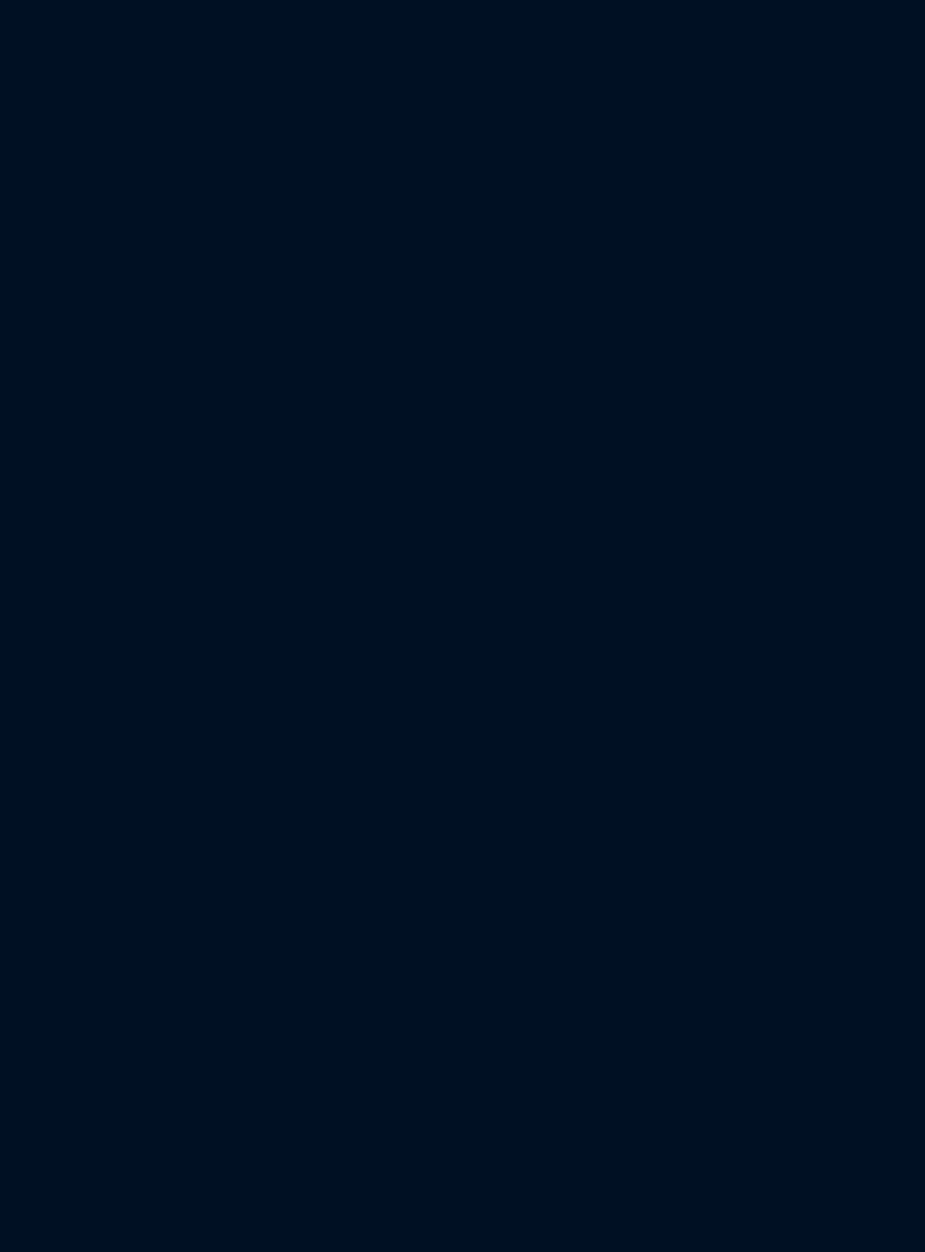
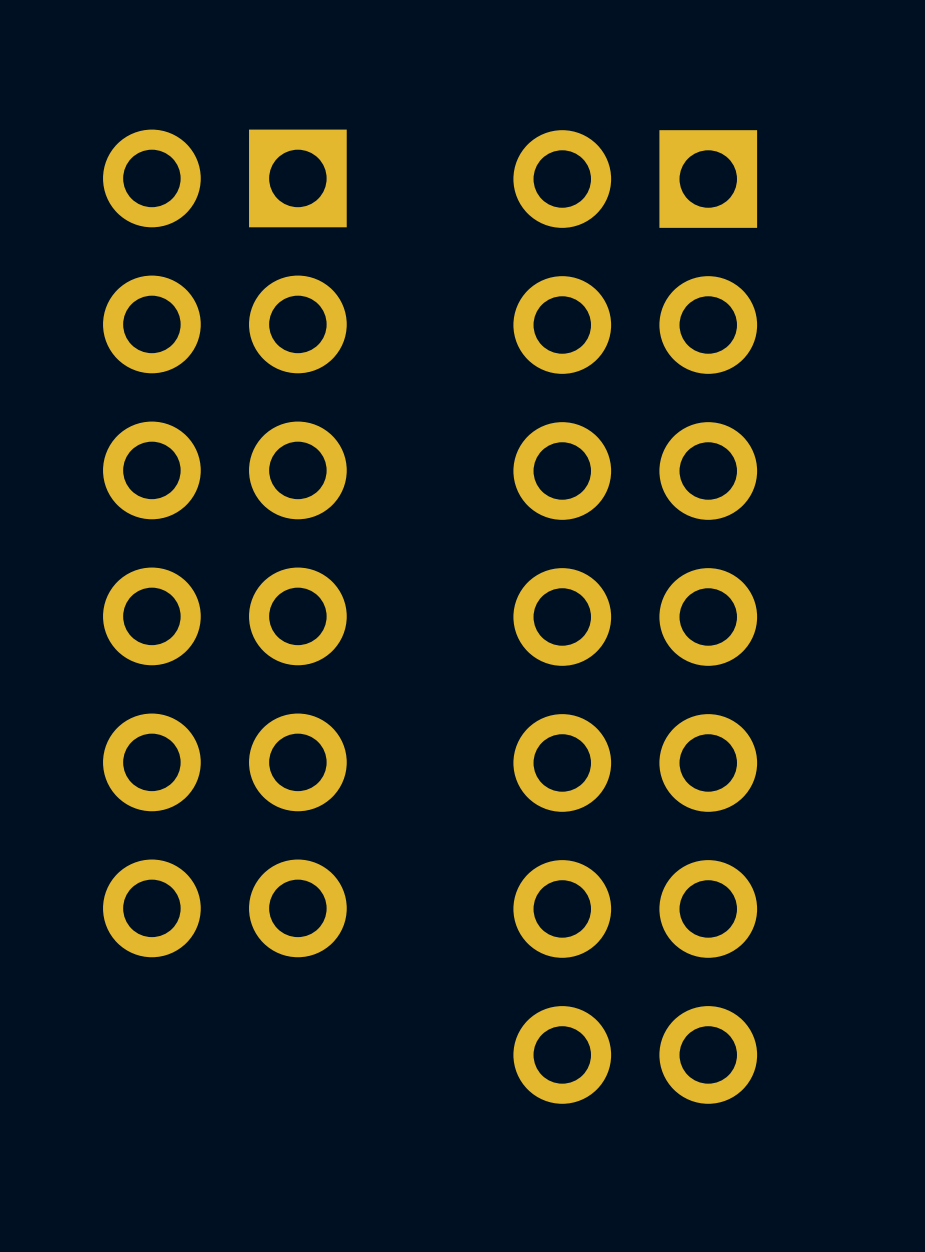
part: none -> (224, 543)
part: none -> (635, 616)

